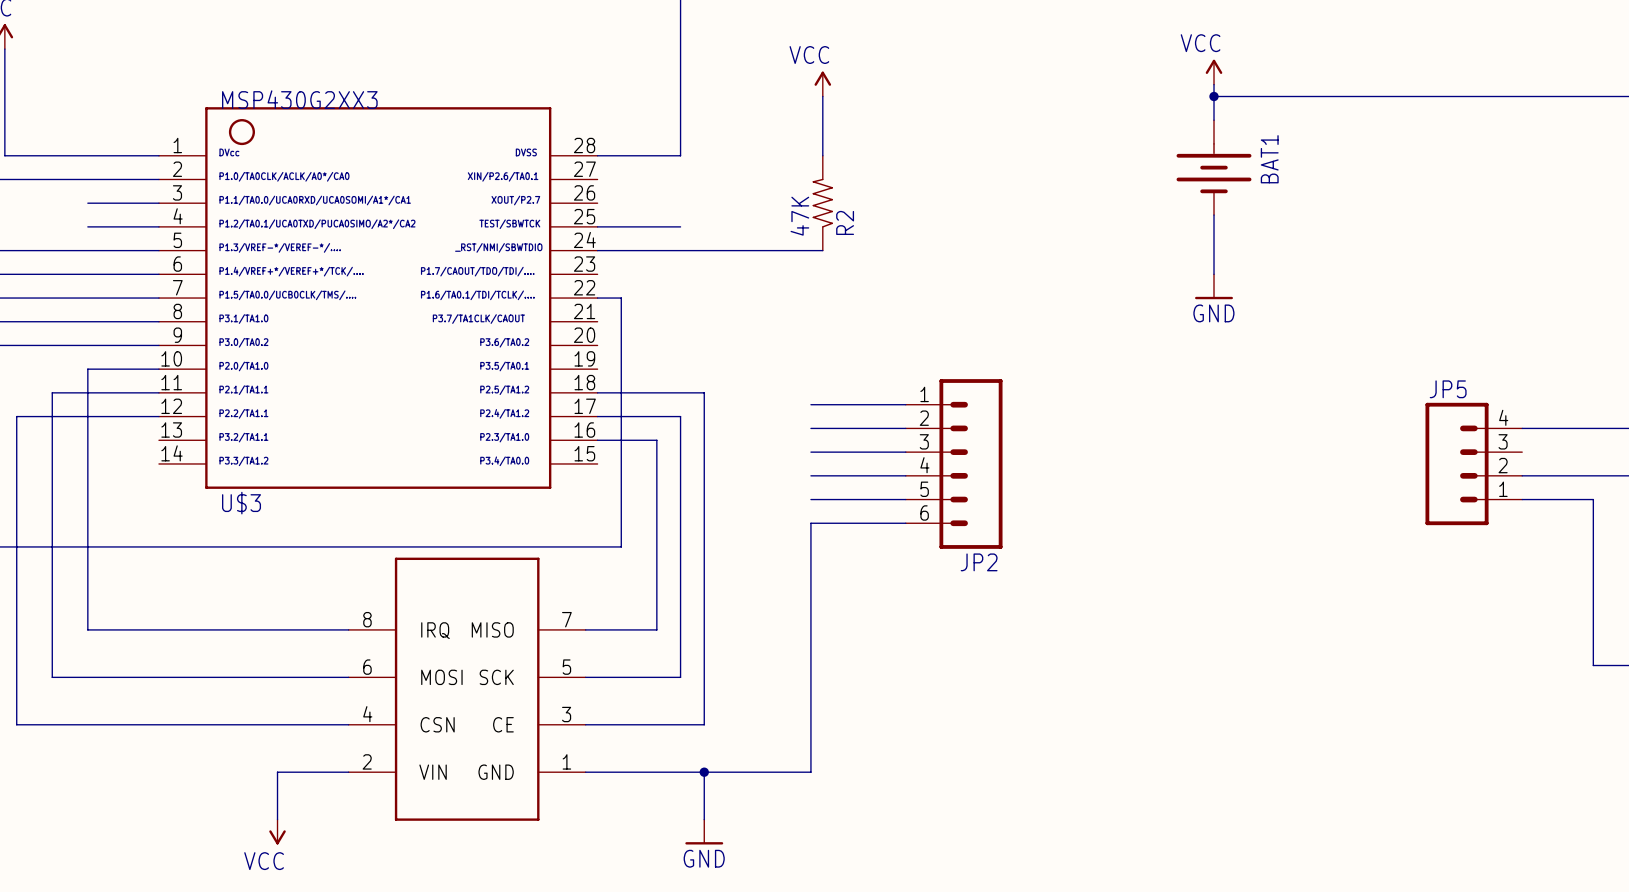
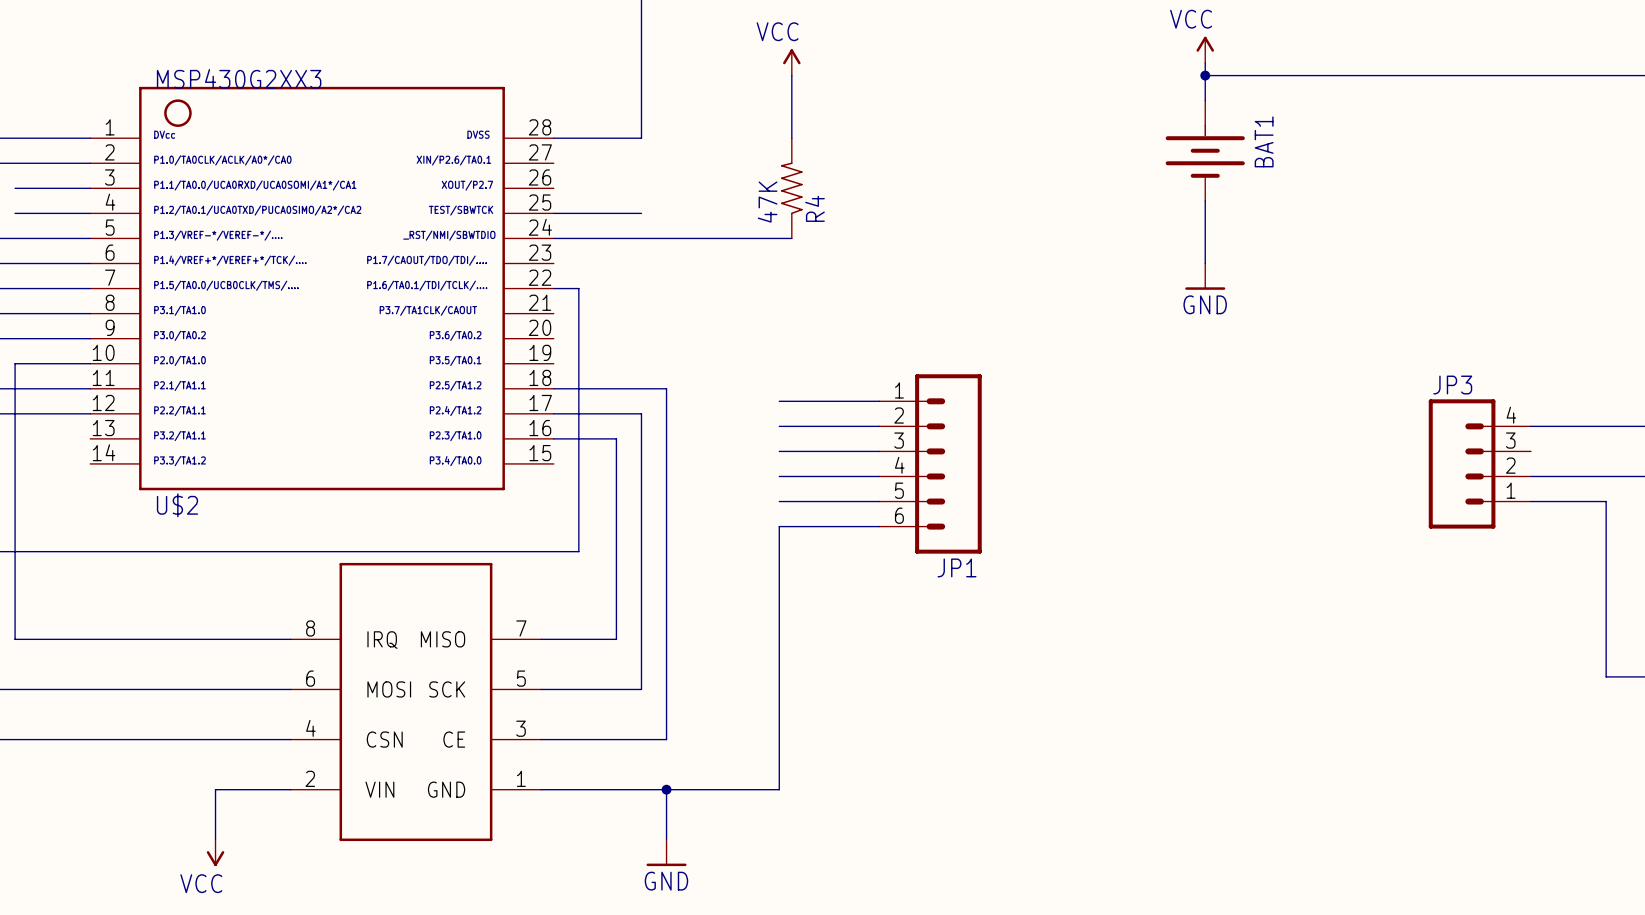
R2 name: R2 (845, 222) -> R4 (814, 208)
JP5 name: JP5 (1448, 389) -> JP3 (1452, 385)
U$3 name: U$3 (241, 503) -> U$2 (177, 505)
JP2 name: JP2 (979, 562) -> JP1 (957, 567)

